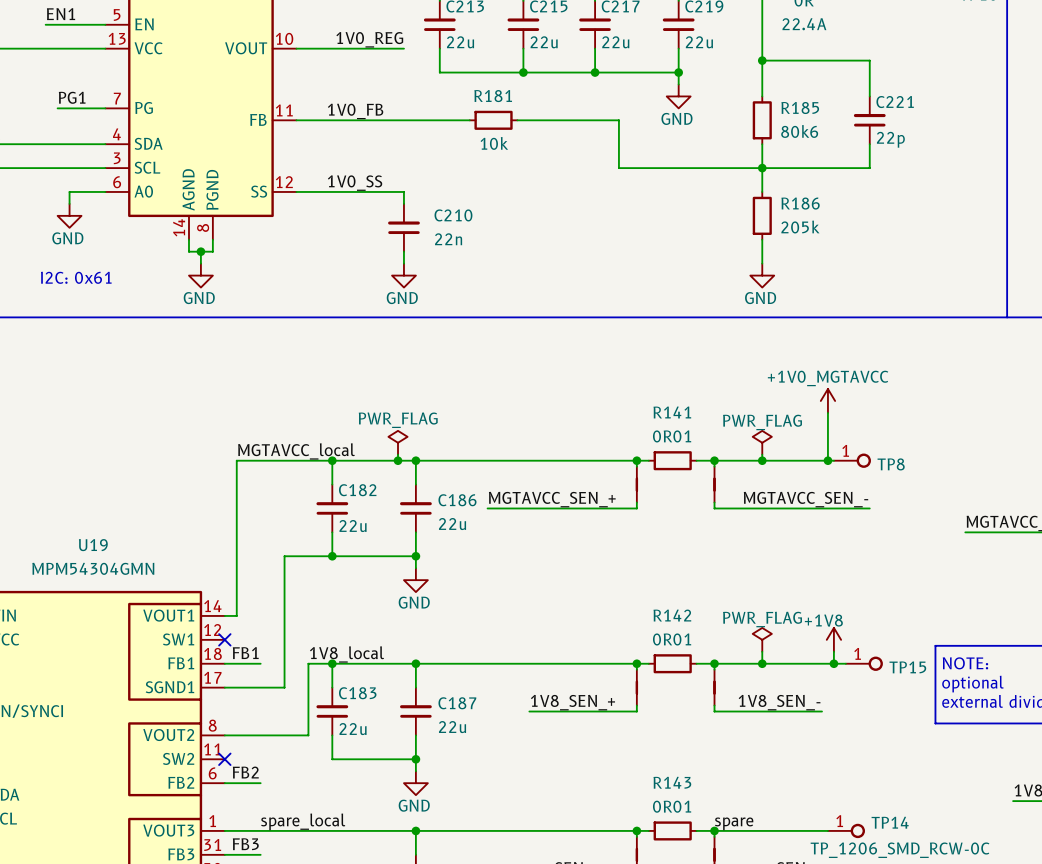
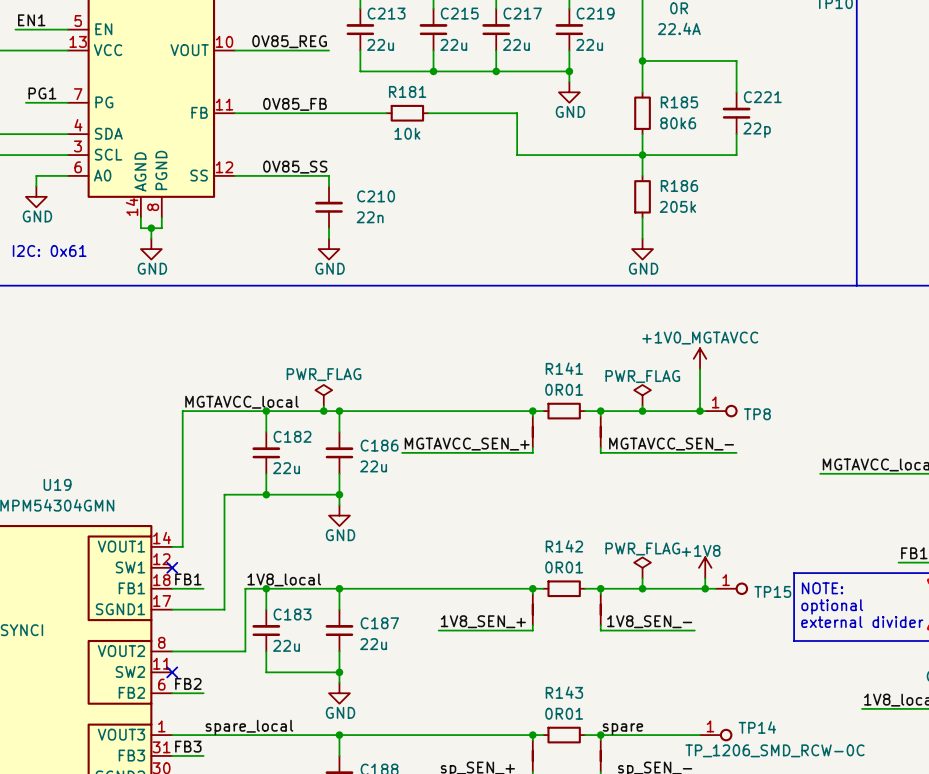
label: 1V0_REG (369, 39) -> 0V85_REG (289, 41)
label: 1V0_FB (355, 111) -> 0V85_FB (295, 104)
label: 1V0_SS (355, 183) -> 0V85_SS (295, 167)

